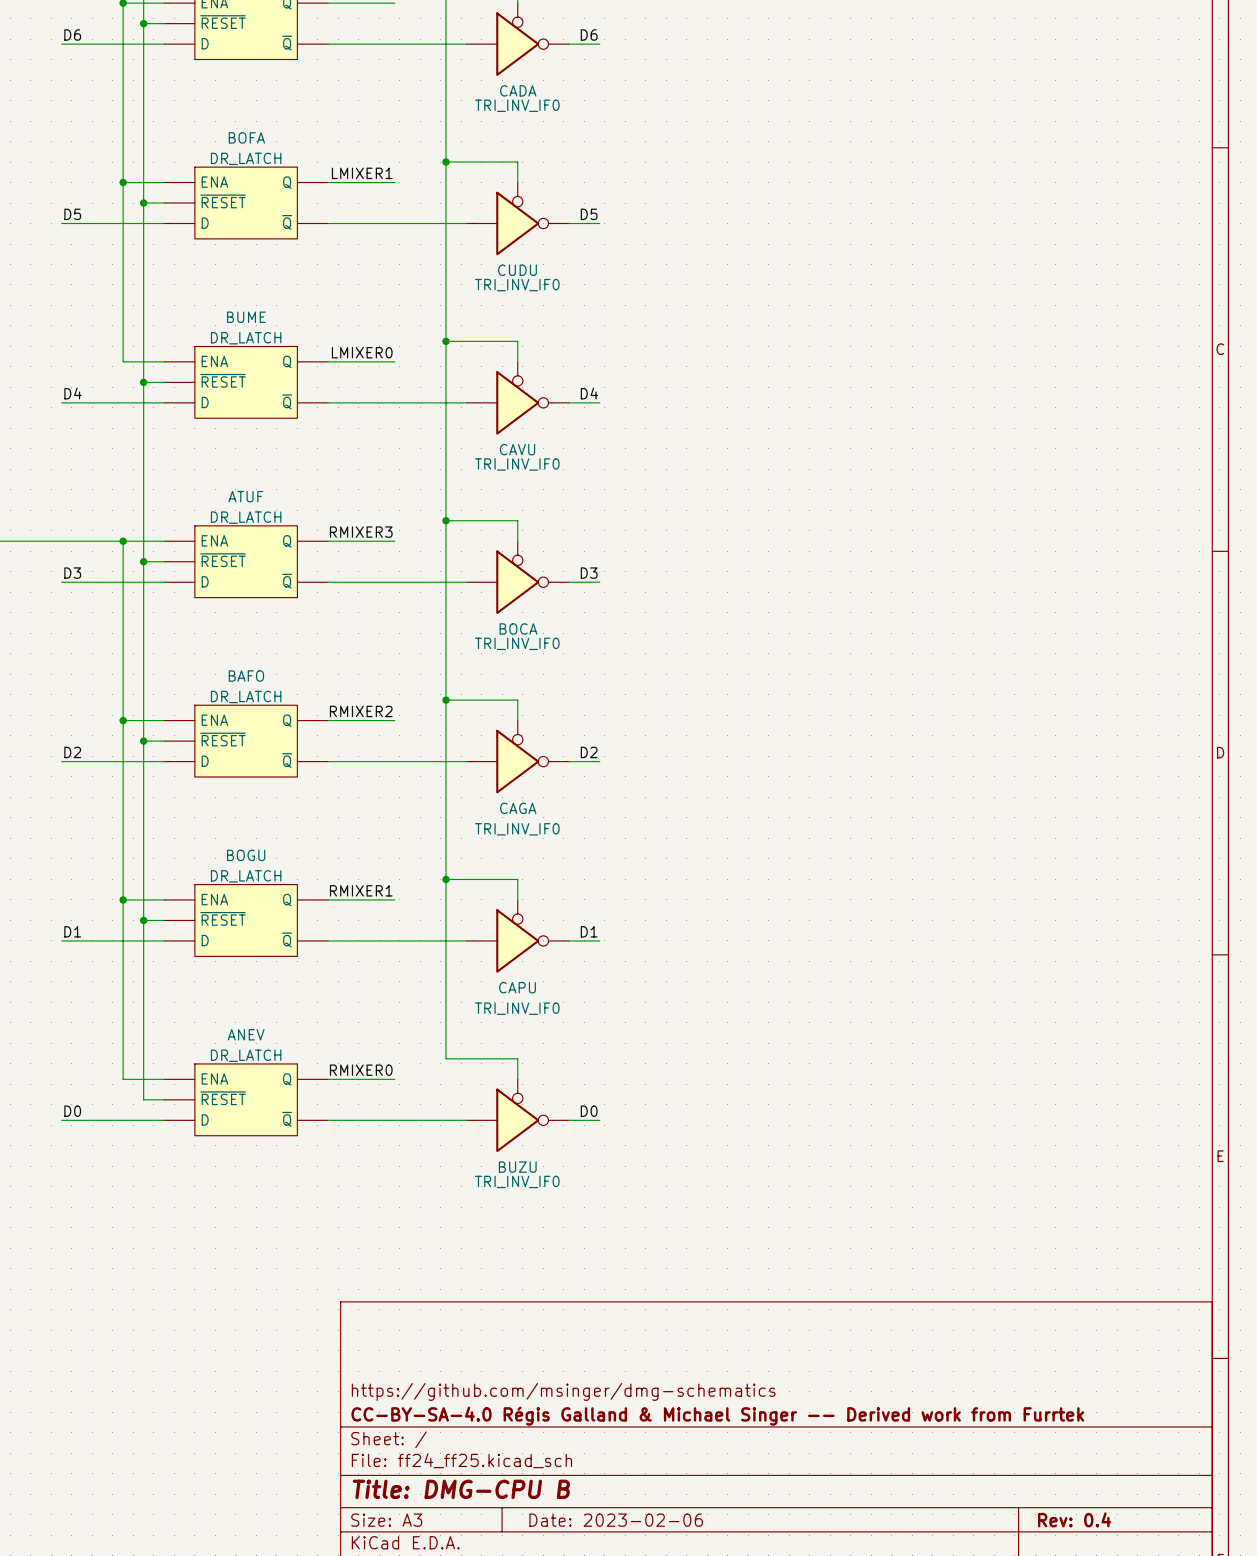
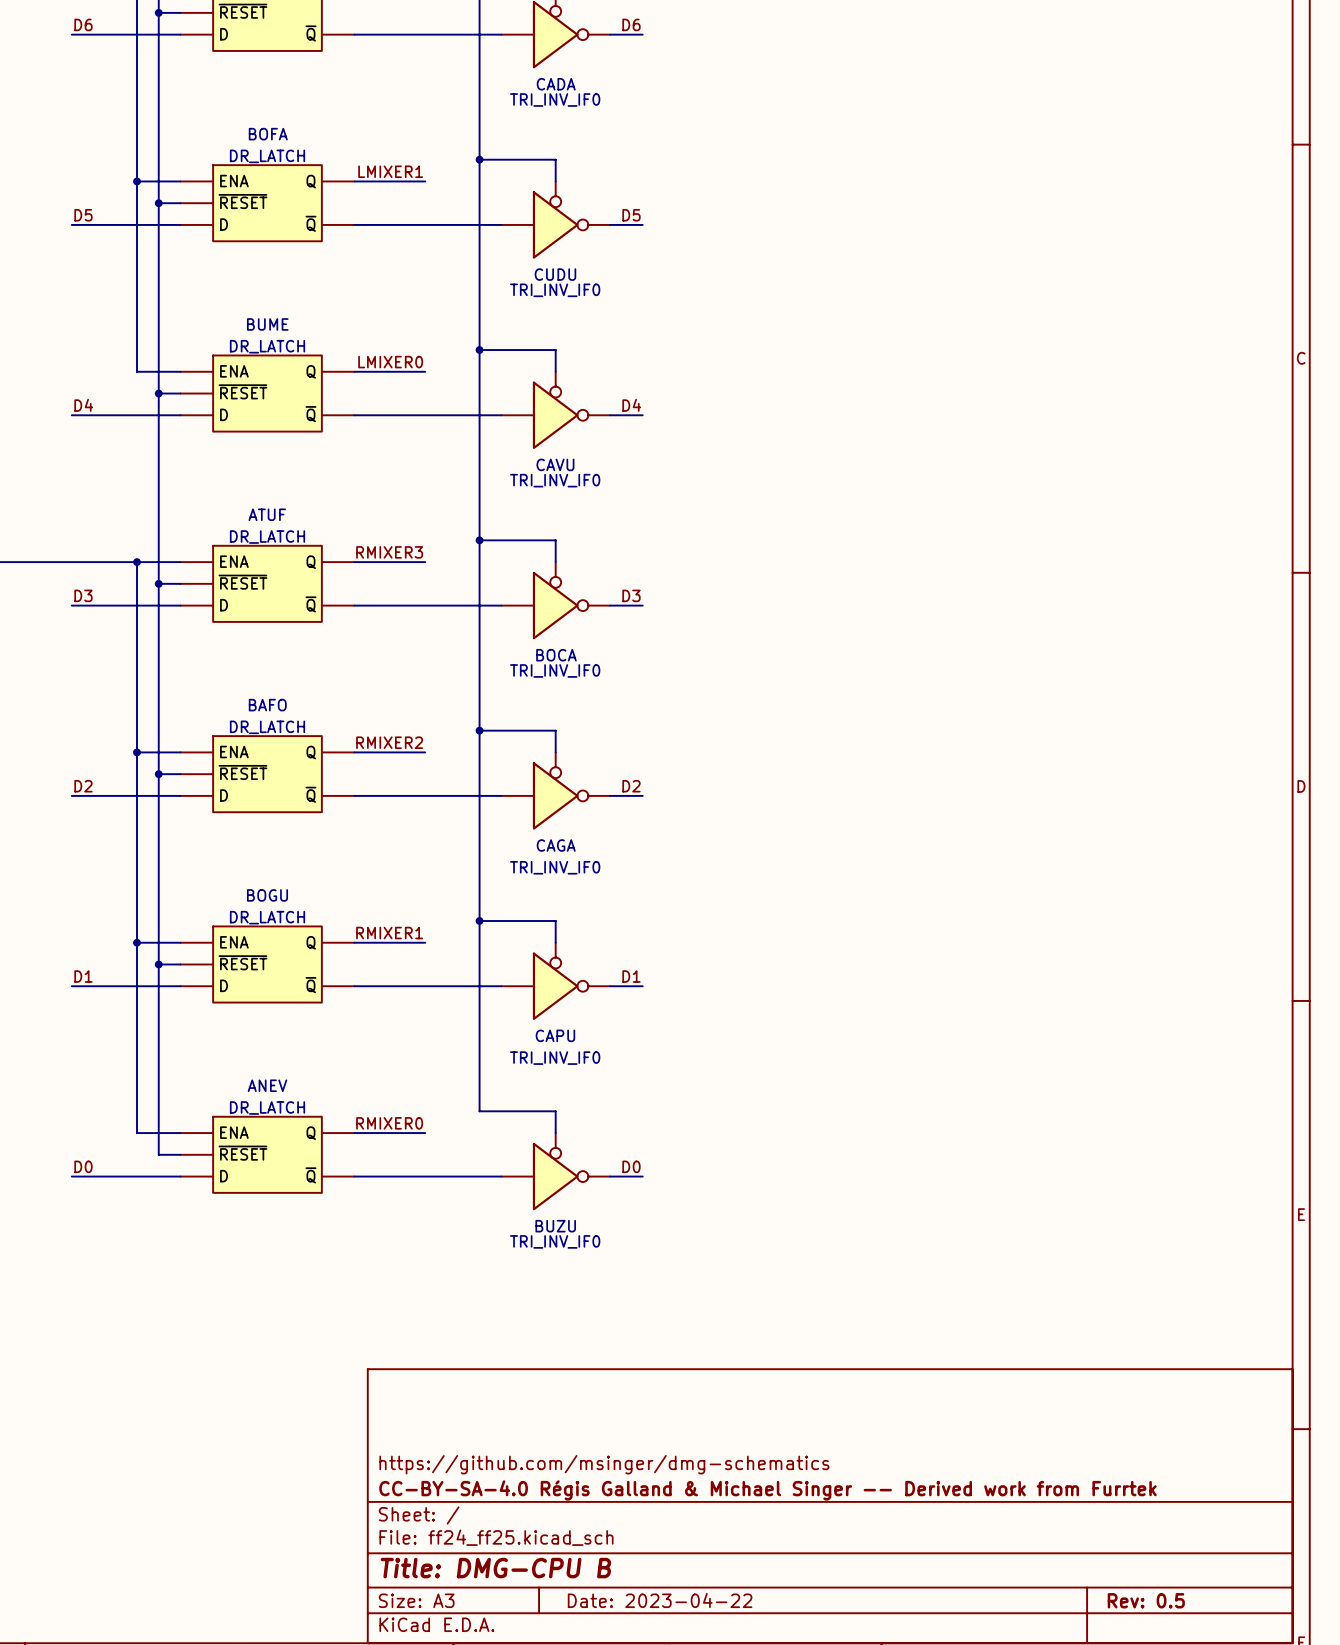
title block: Rev: 0.4 (1074, 1519) -> Rev: 0.5 (1146, 1600)
title block: Date: 2023-02-06 (616, 1520) -> Date: 2023-04-22 (660, 1600)

